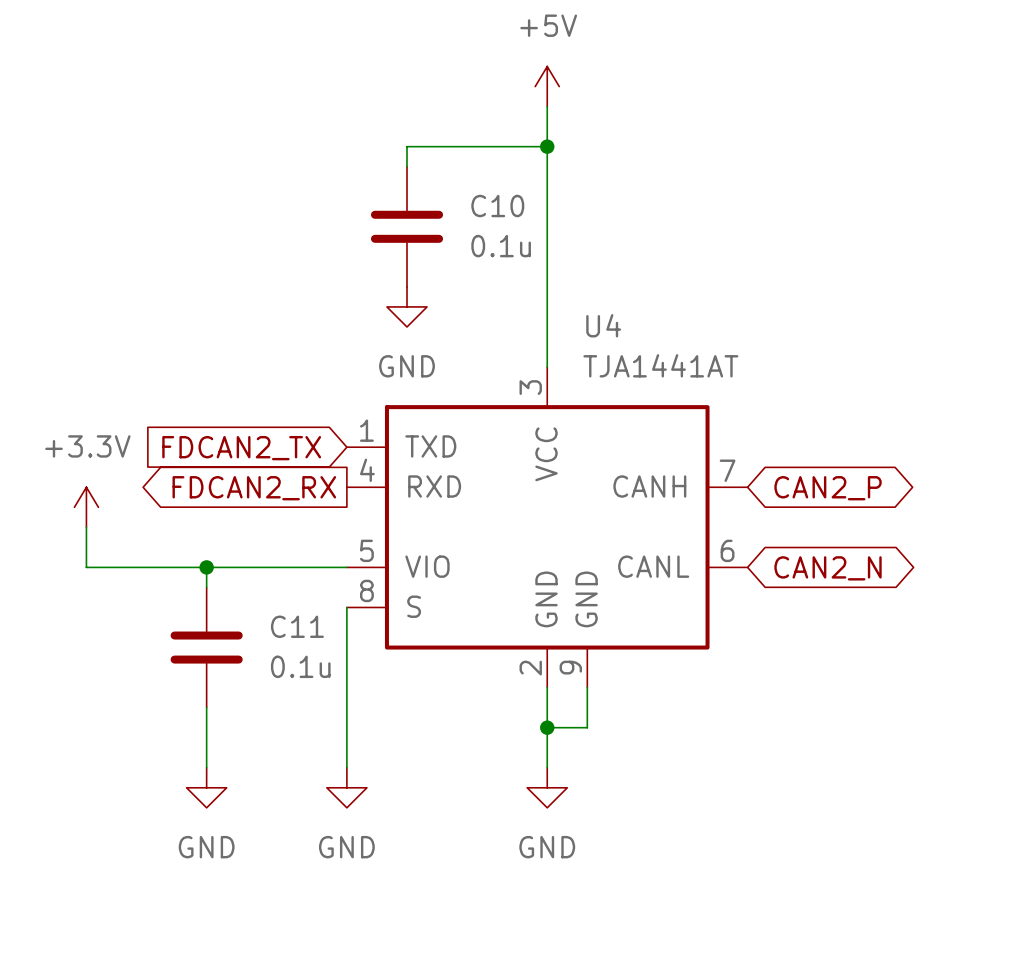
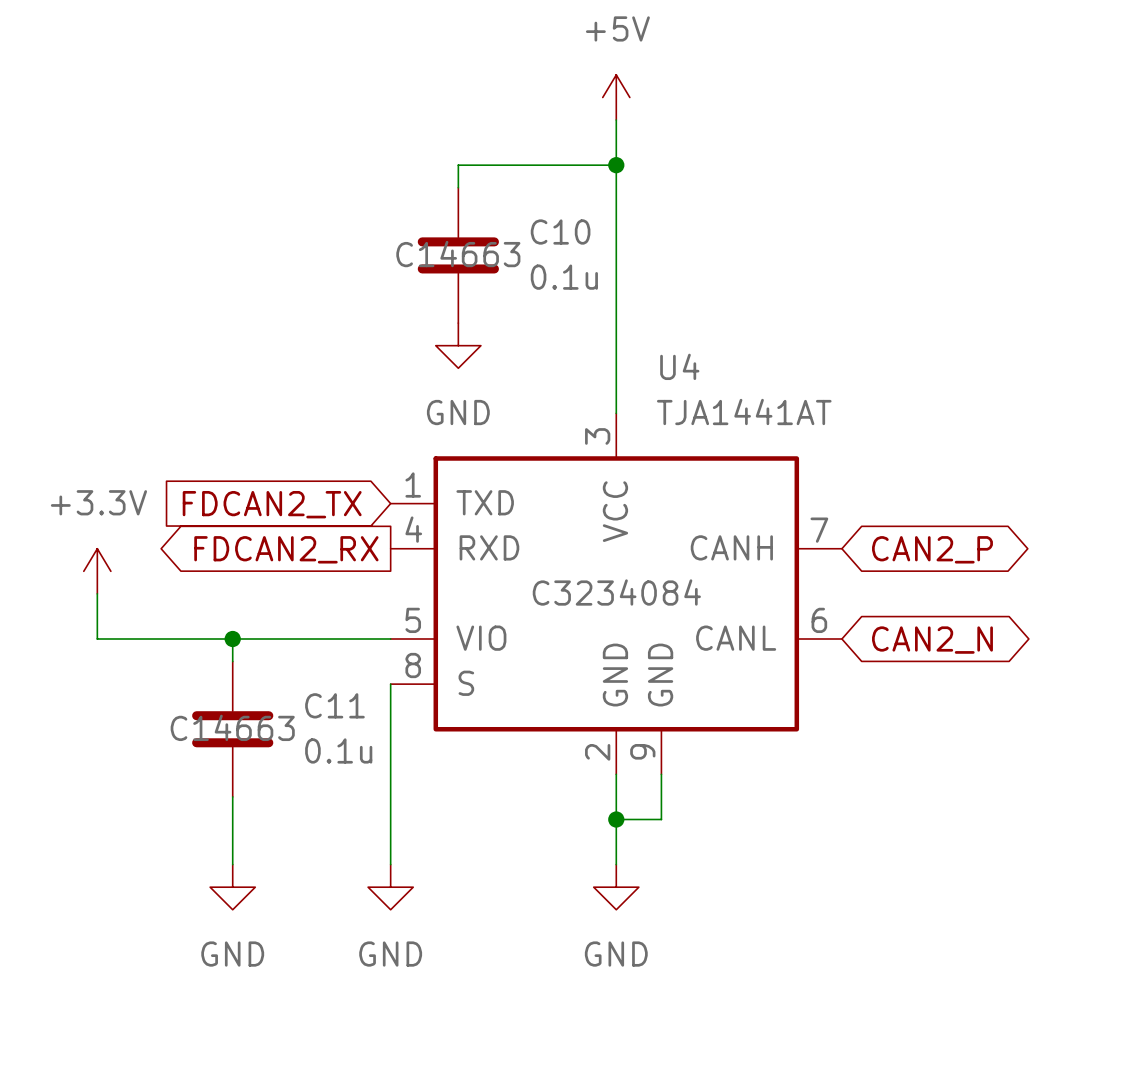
C10 text: none -> C14663 (458, 254)
U4 text: none -> C3234084 (616, 592)
C11 text: none -> C14663 (232, 727)

